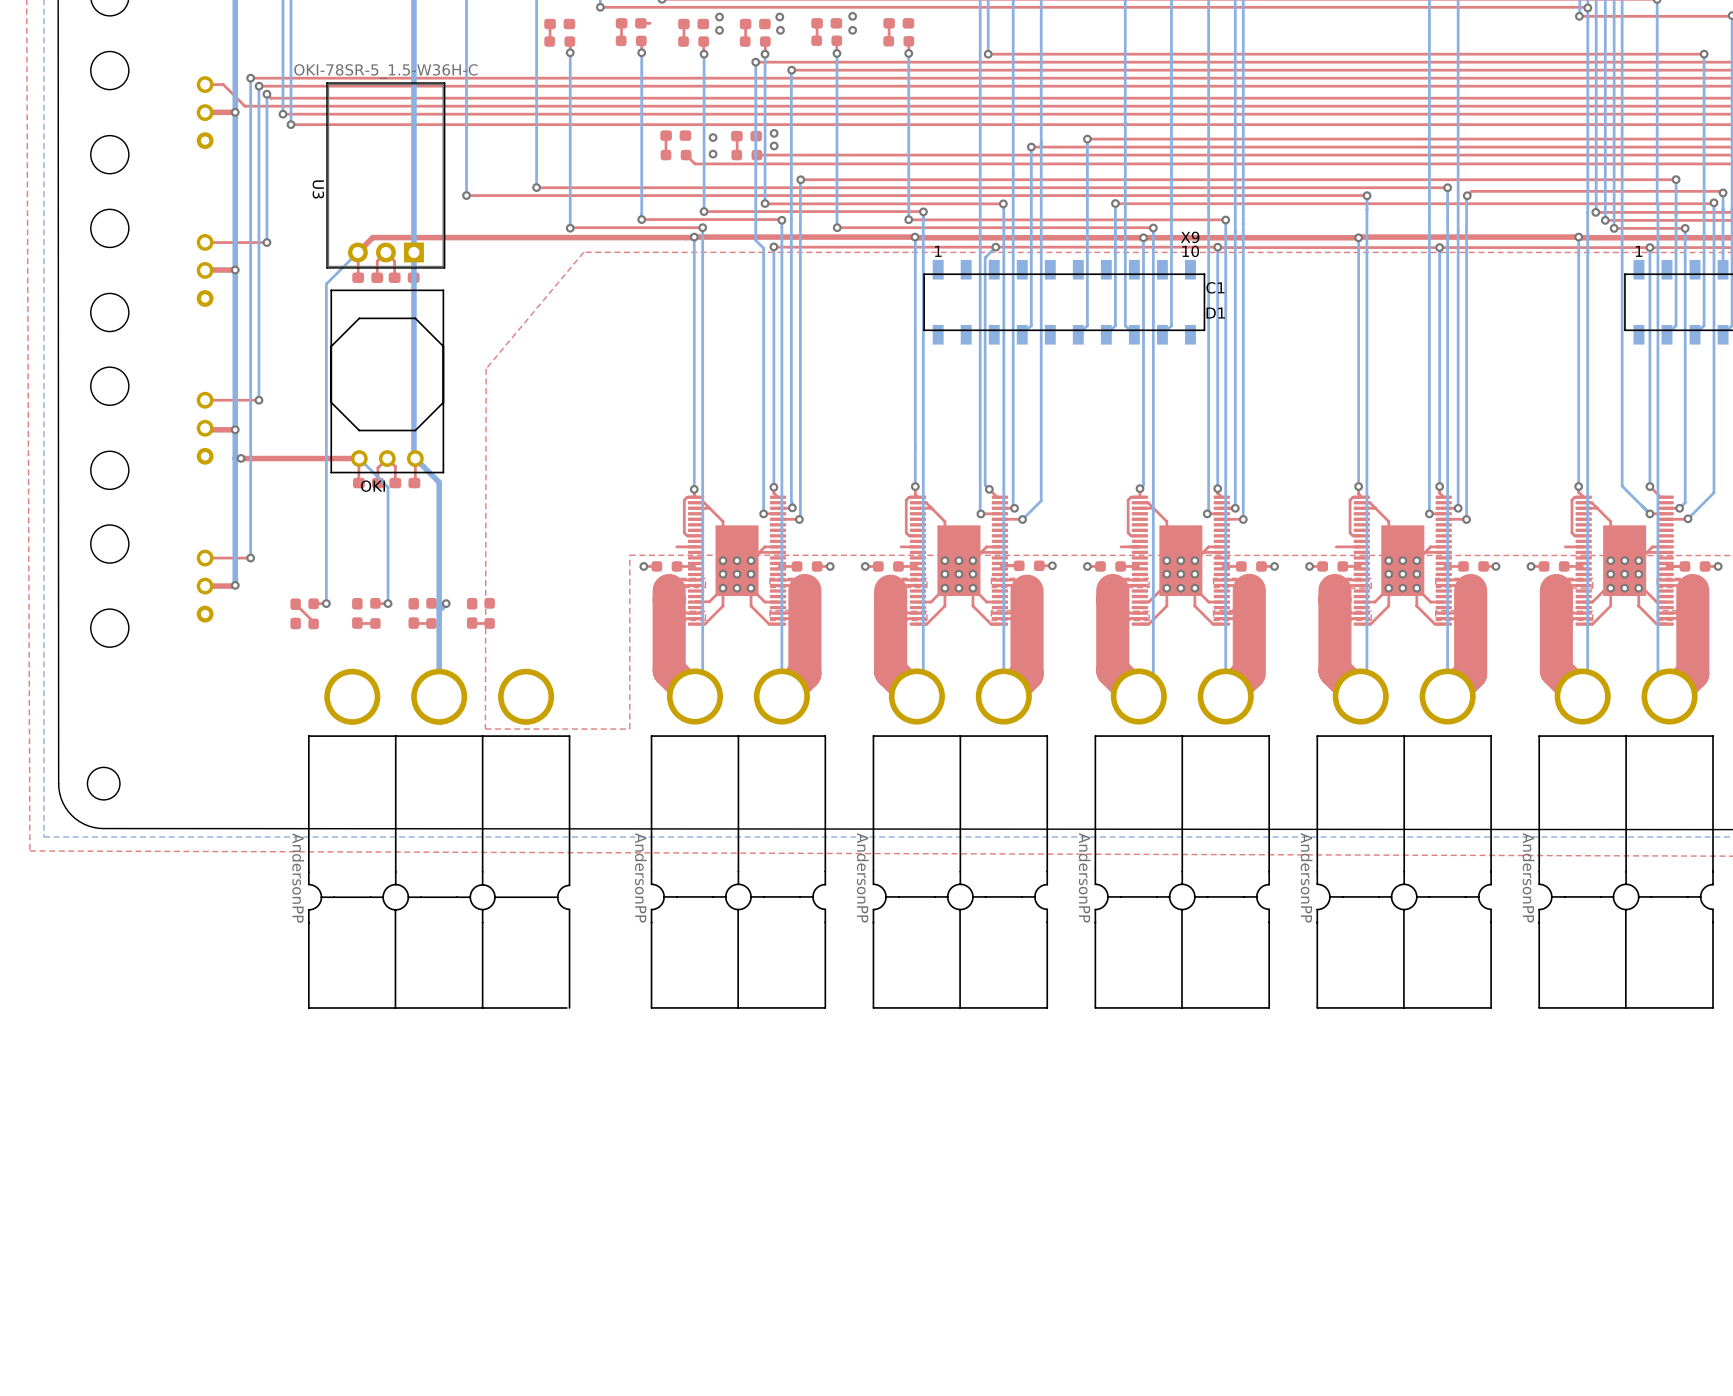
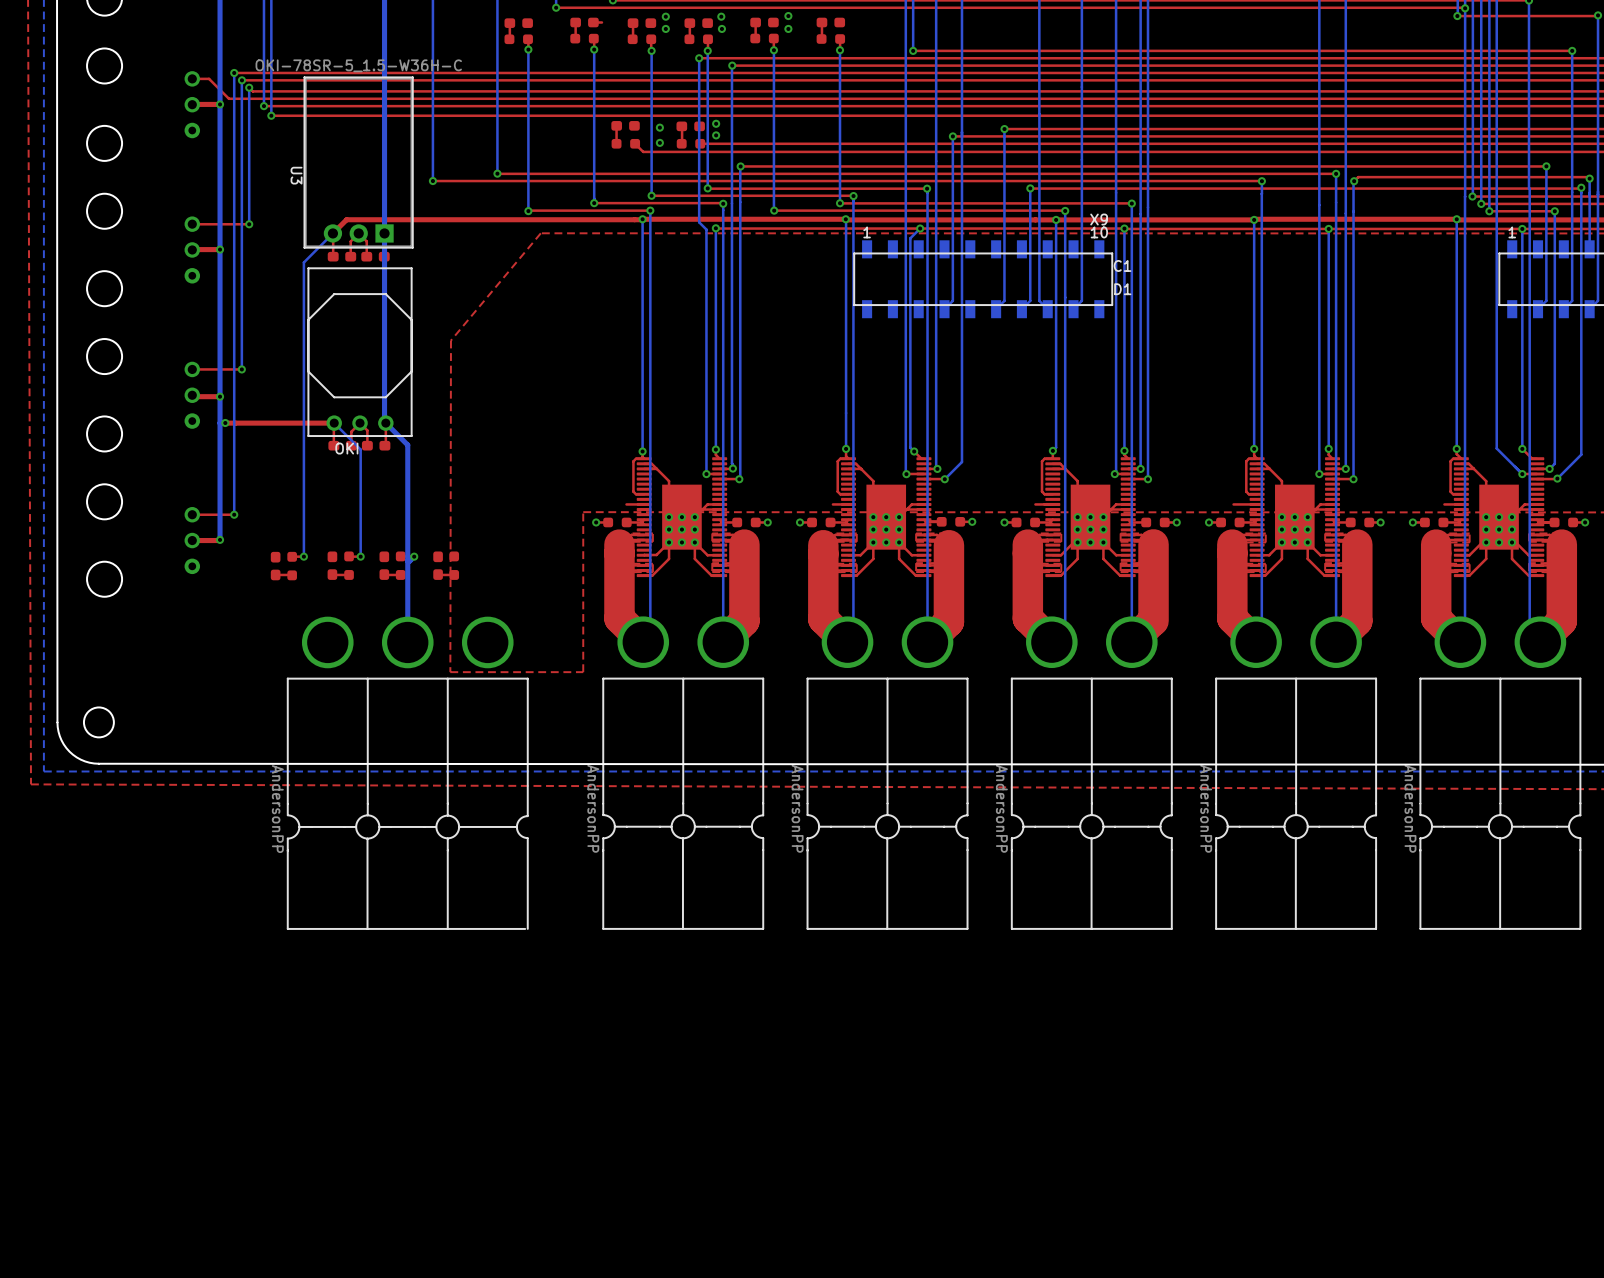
top track: (295, 604) (313, 623) -> none
top track: none -> (292, 574) (276, 574)

